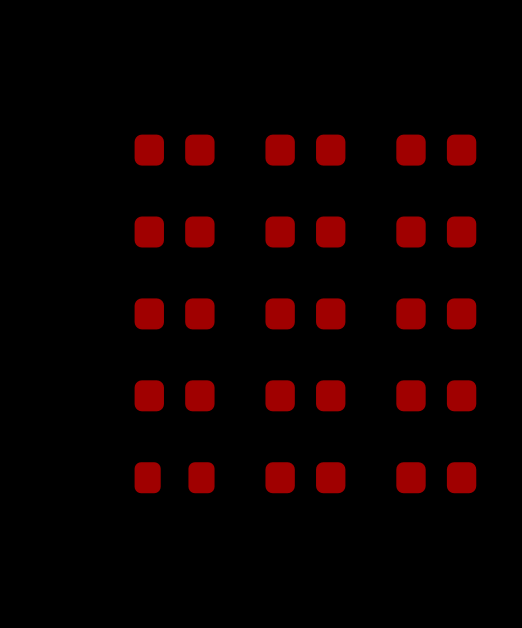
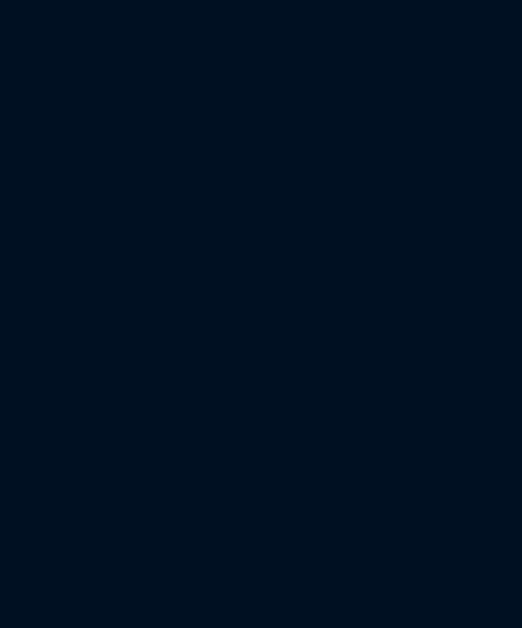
part: (174, 150) -> none
part: (305, 150) -> none
part: (436, 150) -> none
part: (174, 232) -> none
part: (305, 232) -> none
part: (436, 232) -> none
part: (174, 313) -> none
part: (305, 313) -> none
part: (436, 313) -> none
part: (174, 395) -> none
part: (305, 395) -> none
part: (436, 395) -> none
part: (174, 477) -> none
part: (305, 477) -> none
part: (436, 477) -> none

